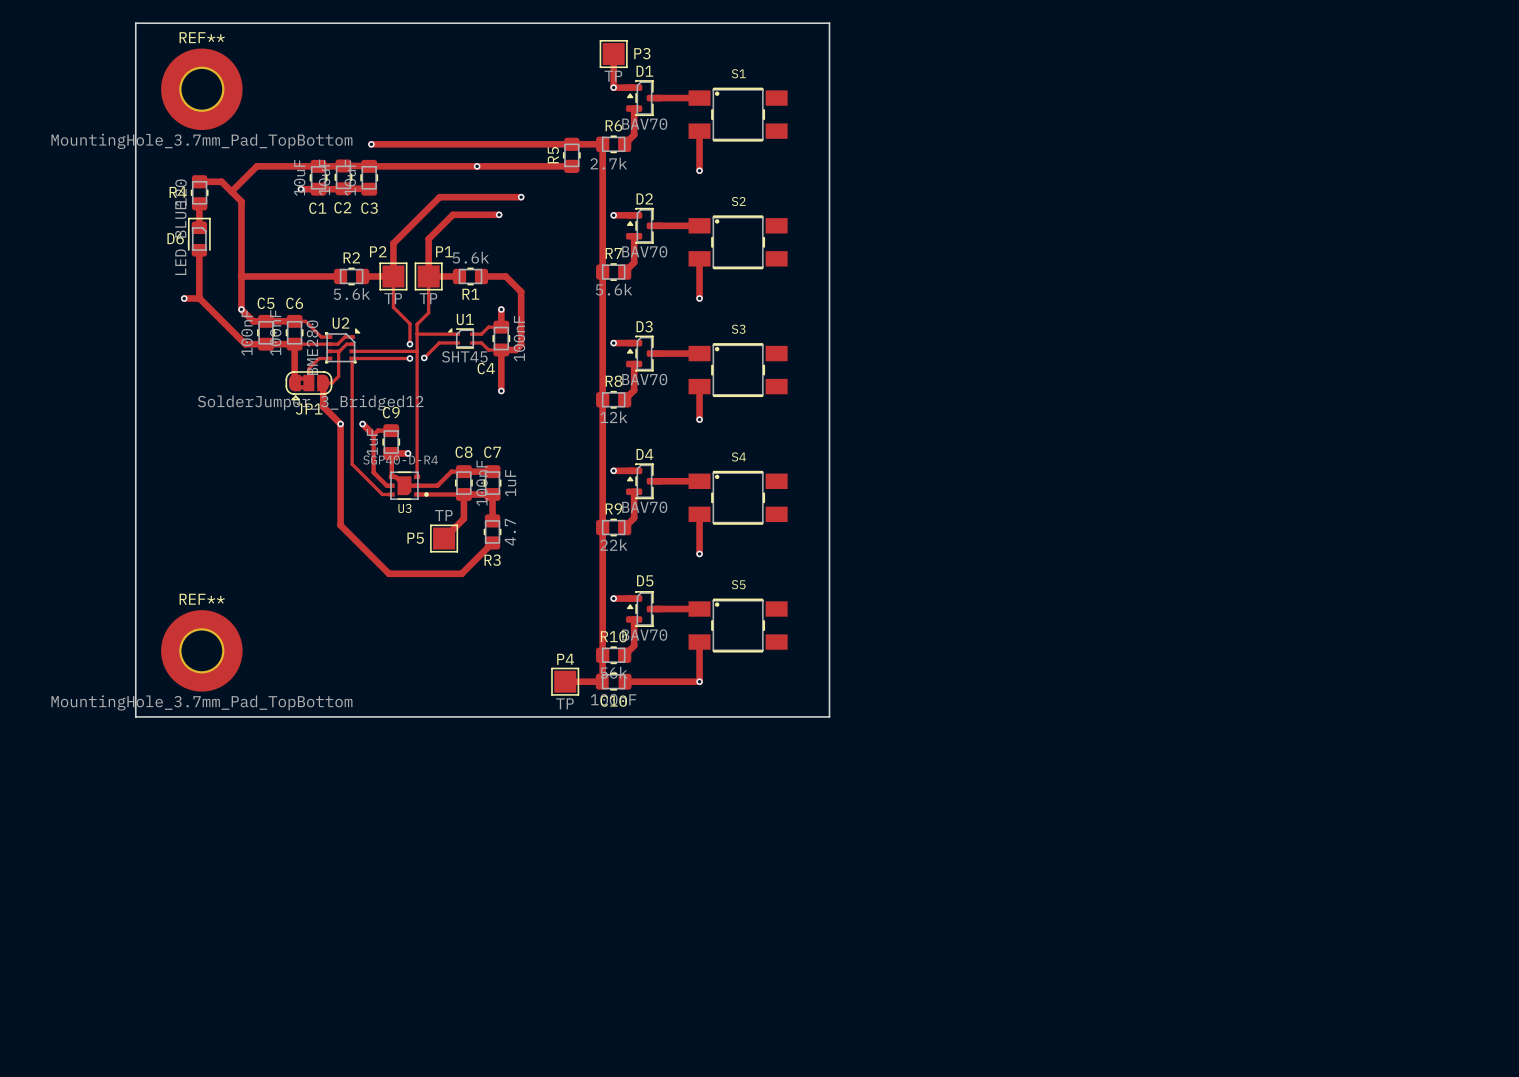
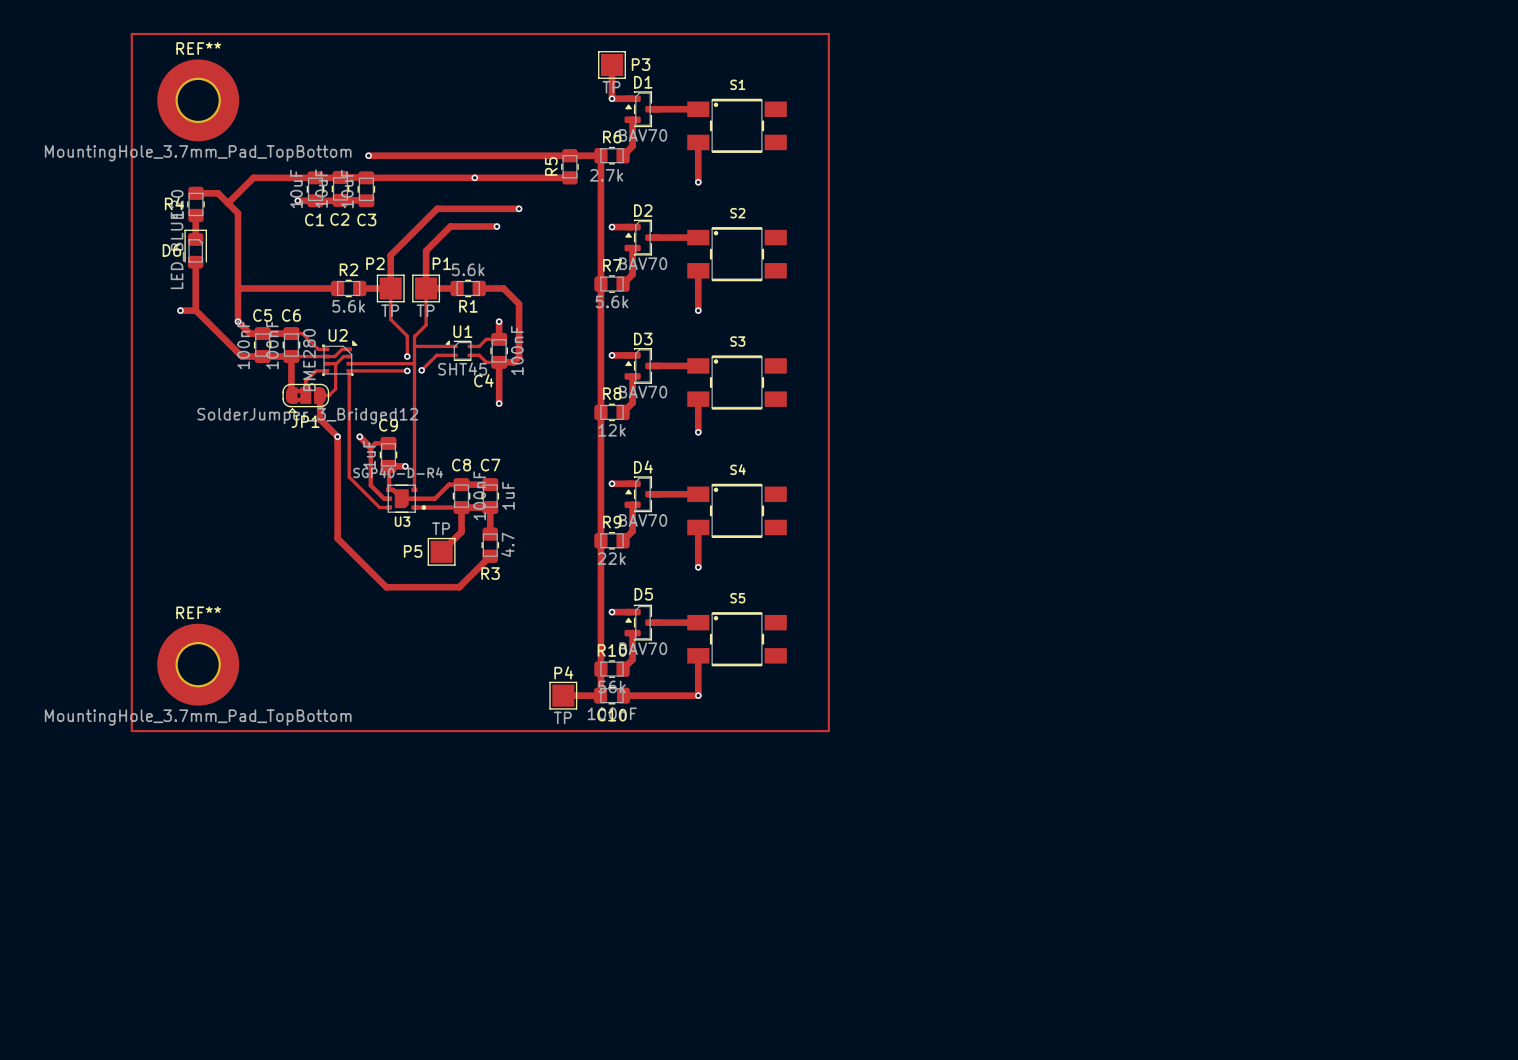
board edge: (135, 23) (135, 716) (829, 716) (829, 23) (135, 23) -> none
track: none -> (131, 34) (828, 34) (828, 731) (131, 731) (131, 34)

